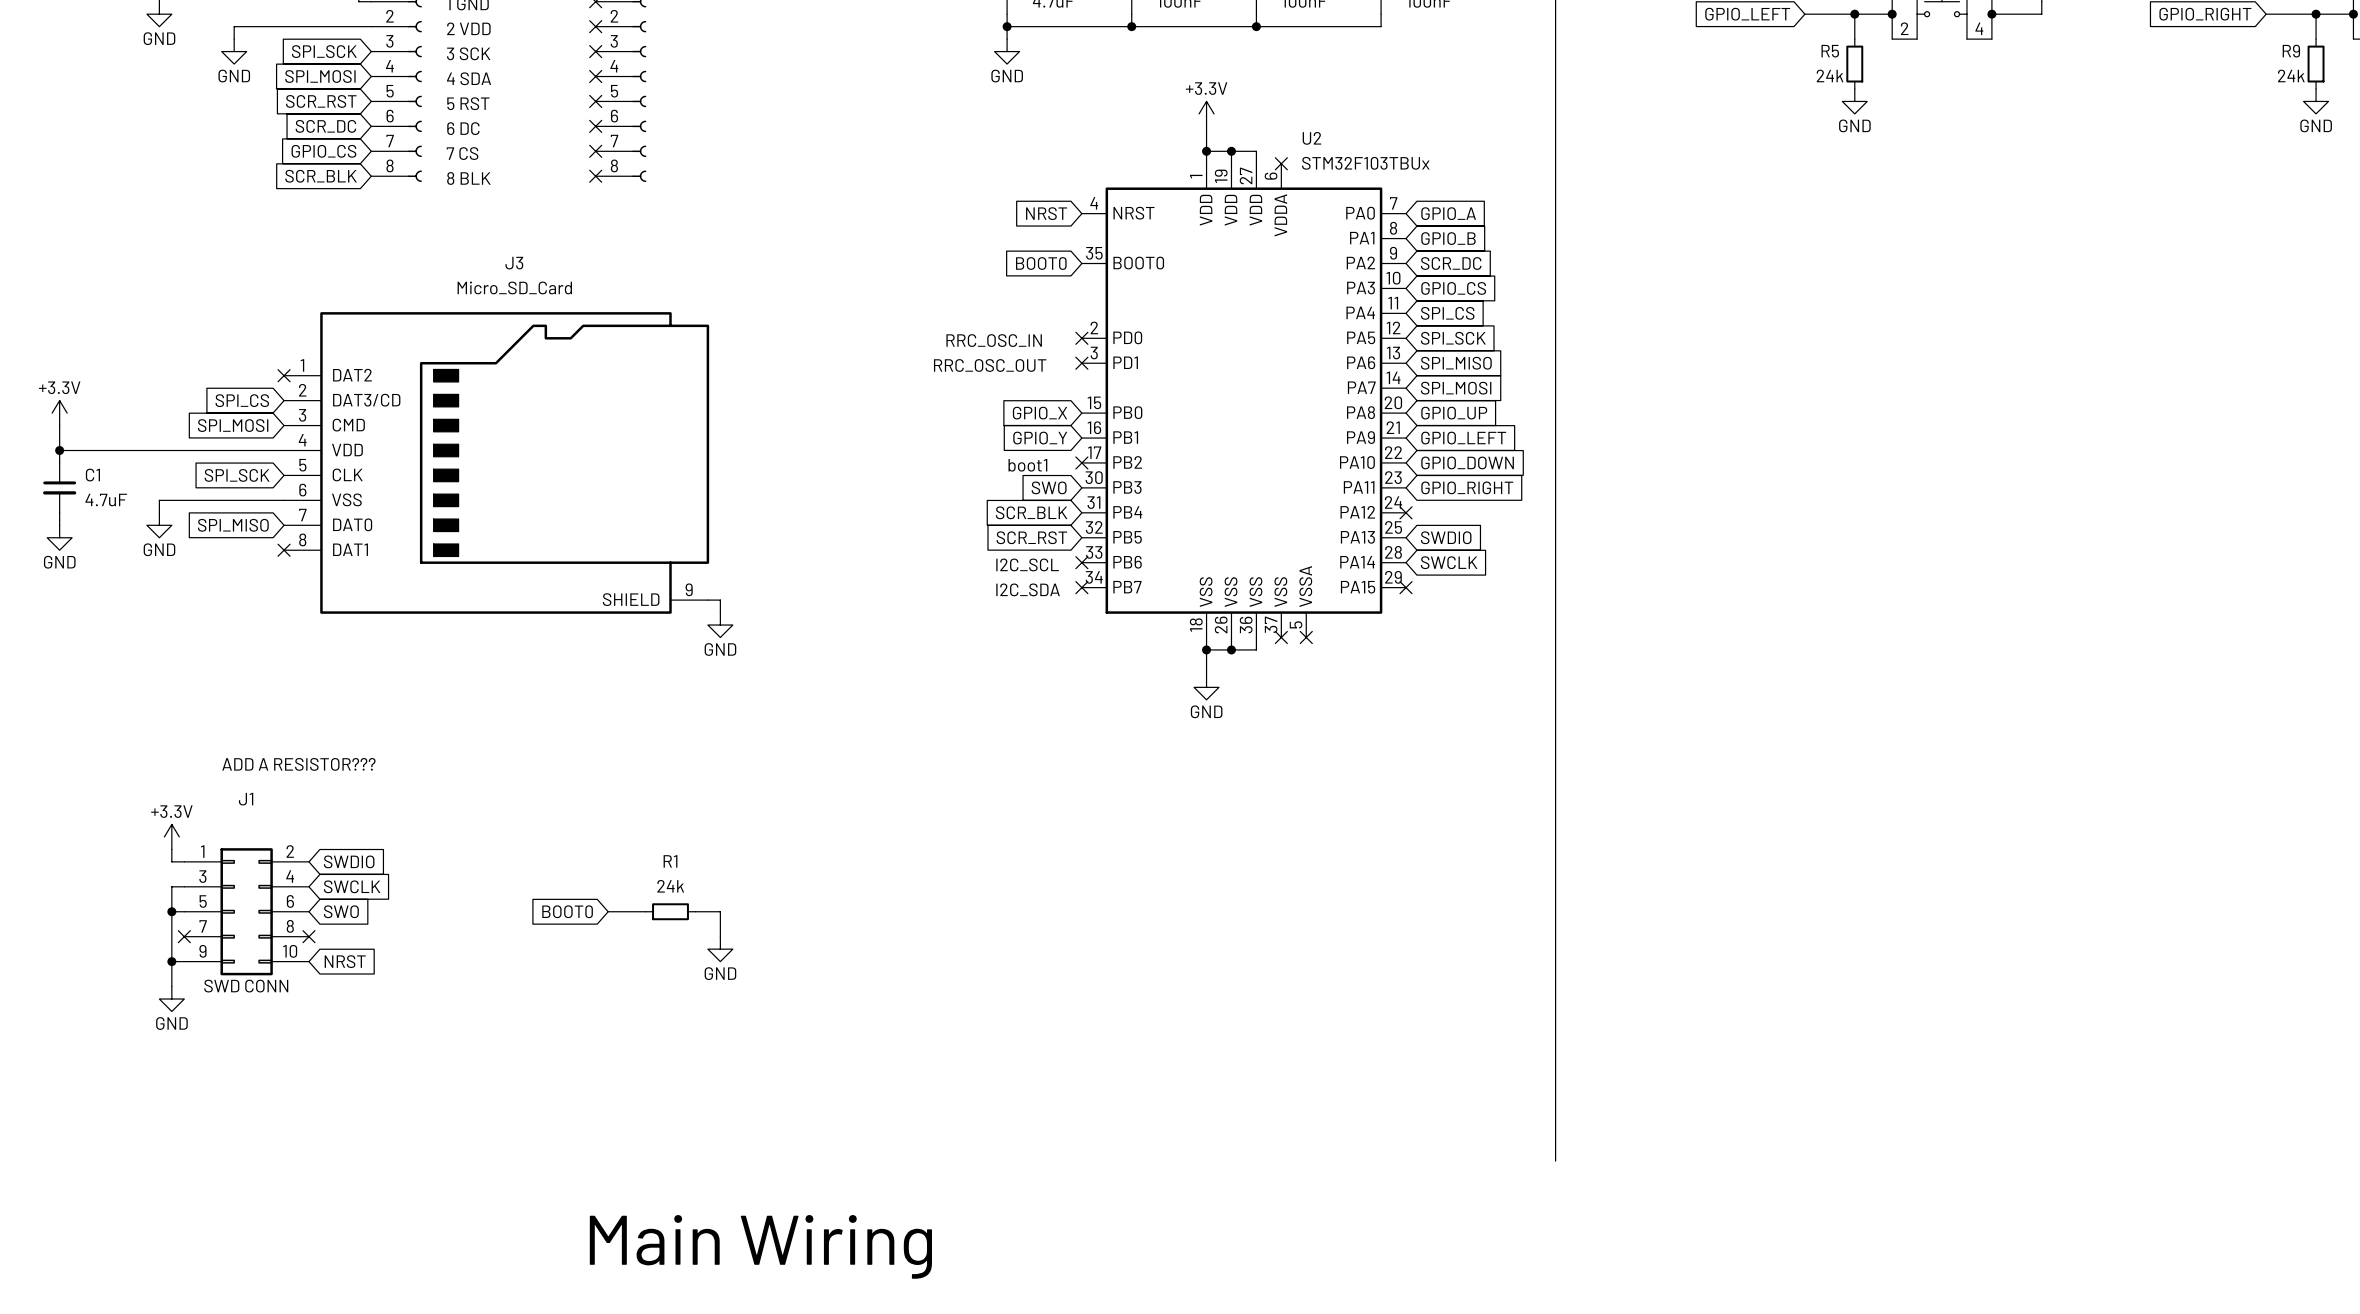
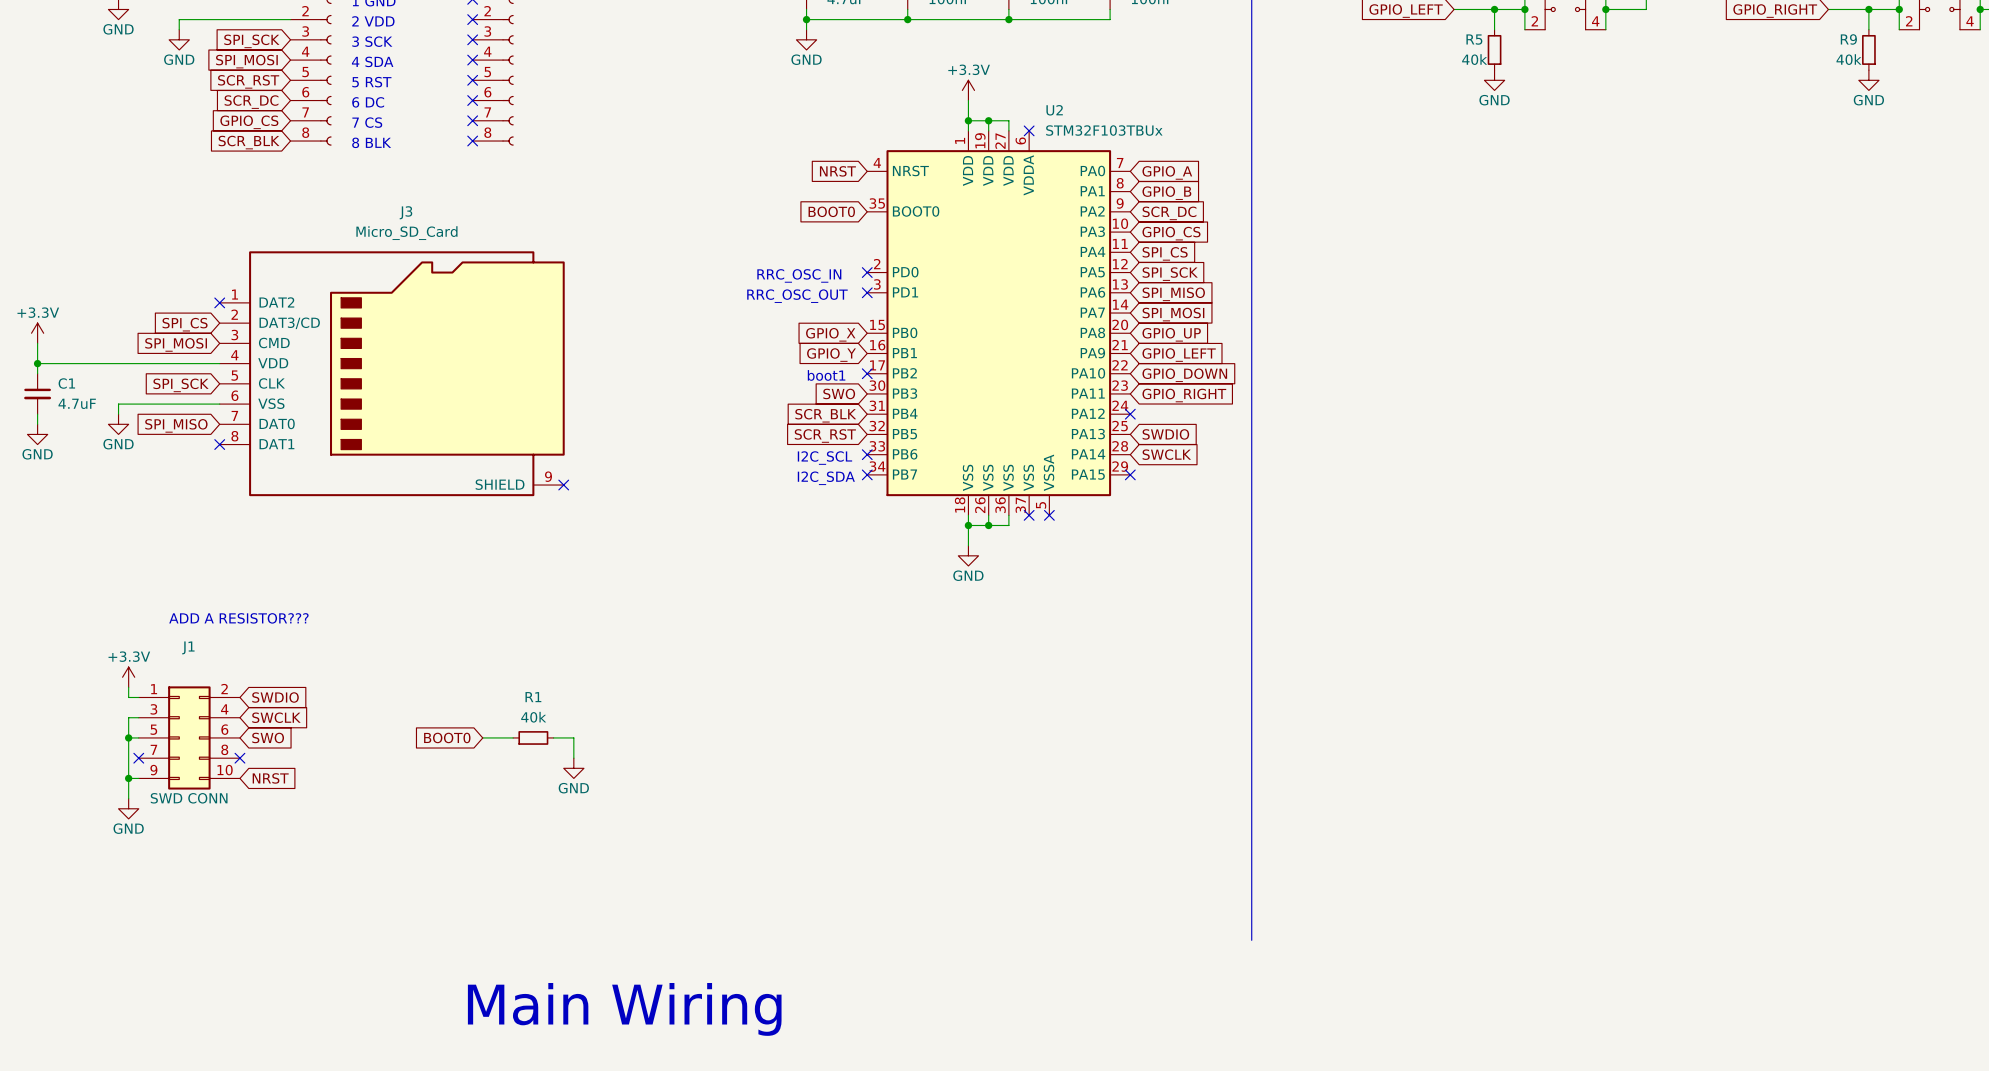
R5 value: 24k (1830, 75) -> 40k (1474, 59)
R9 value: 24k (2291, 75) -> 40k (1848, 59)
wire: (707, 600) (720, 600) (720, 612) -> none
no-connect mark: none -> (563, 485)
power symbol: GND (720, 625) -> none
R1 value: 24k (670, 886) -> 40k (533, 717)

